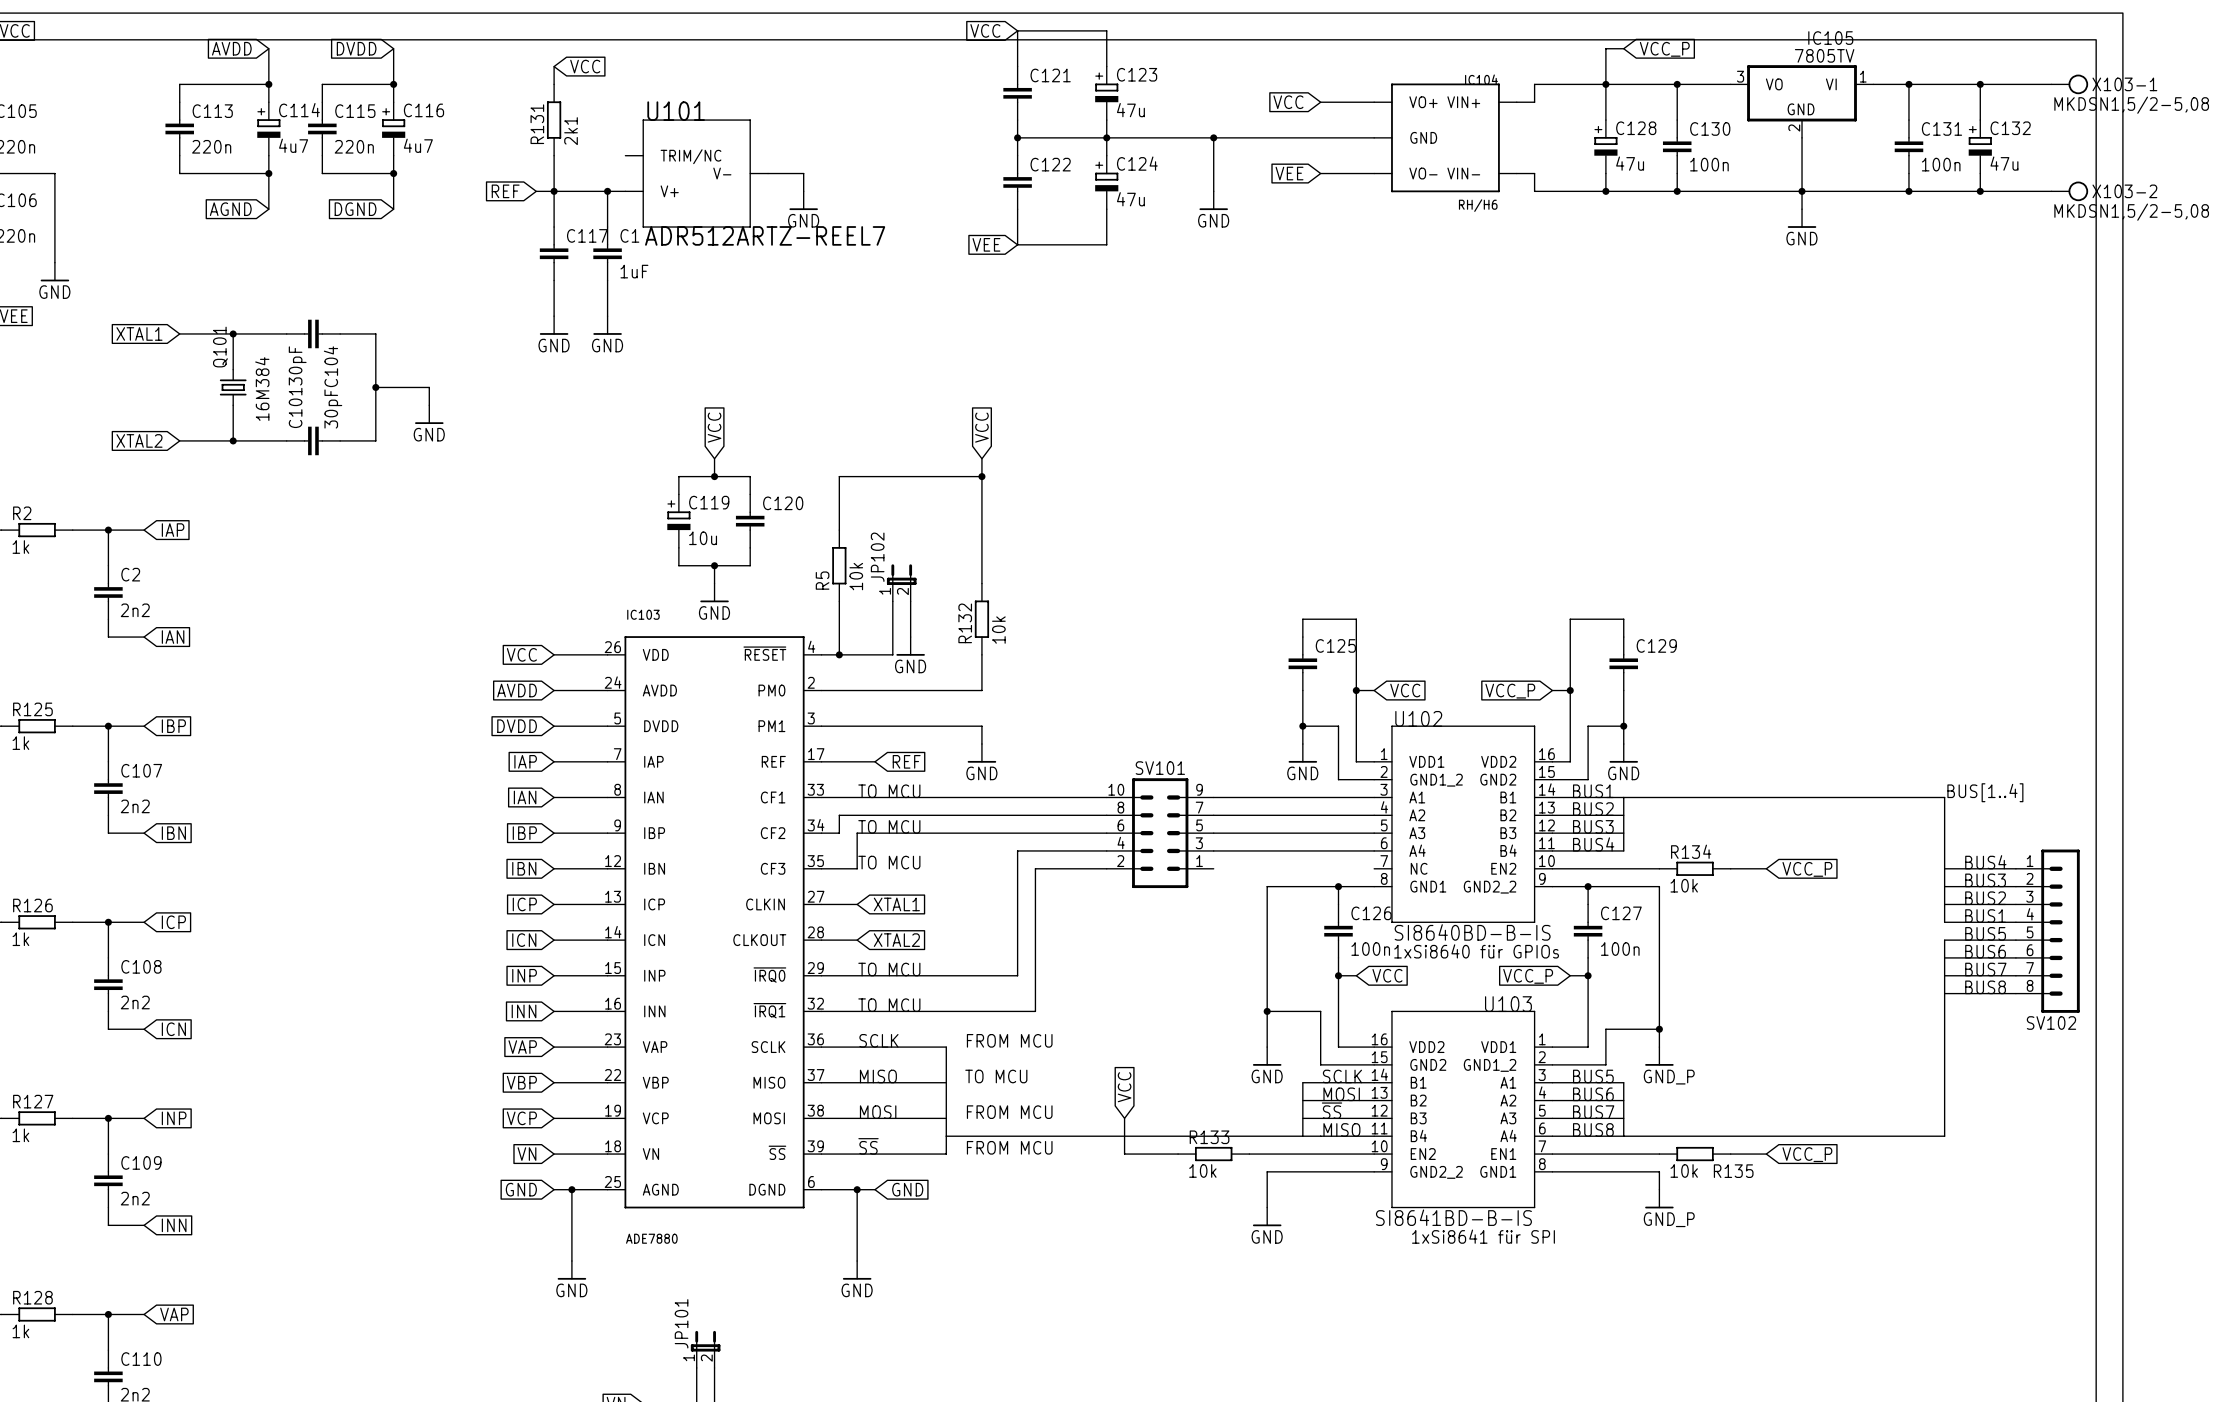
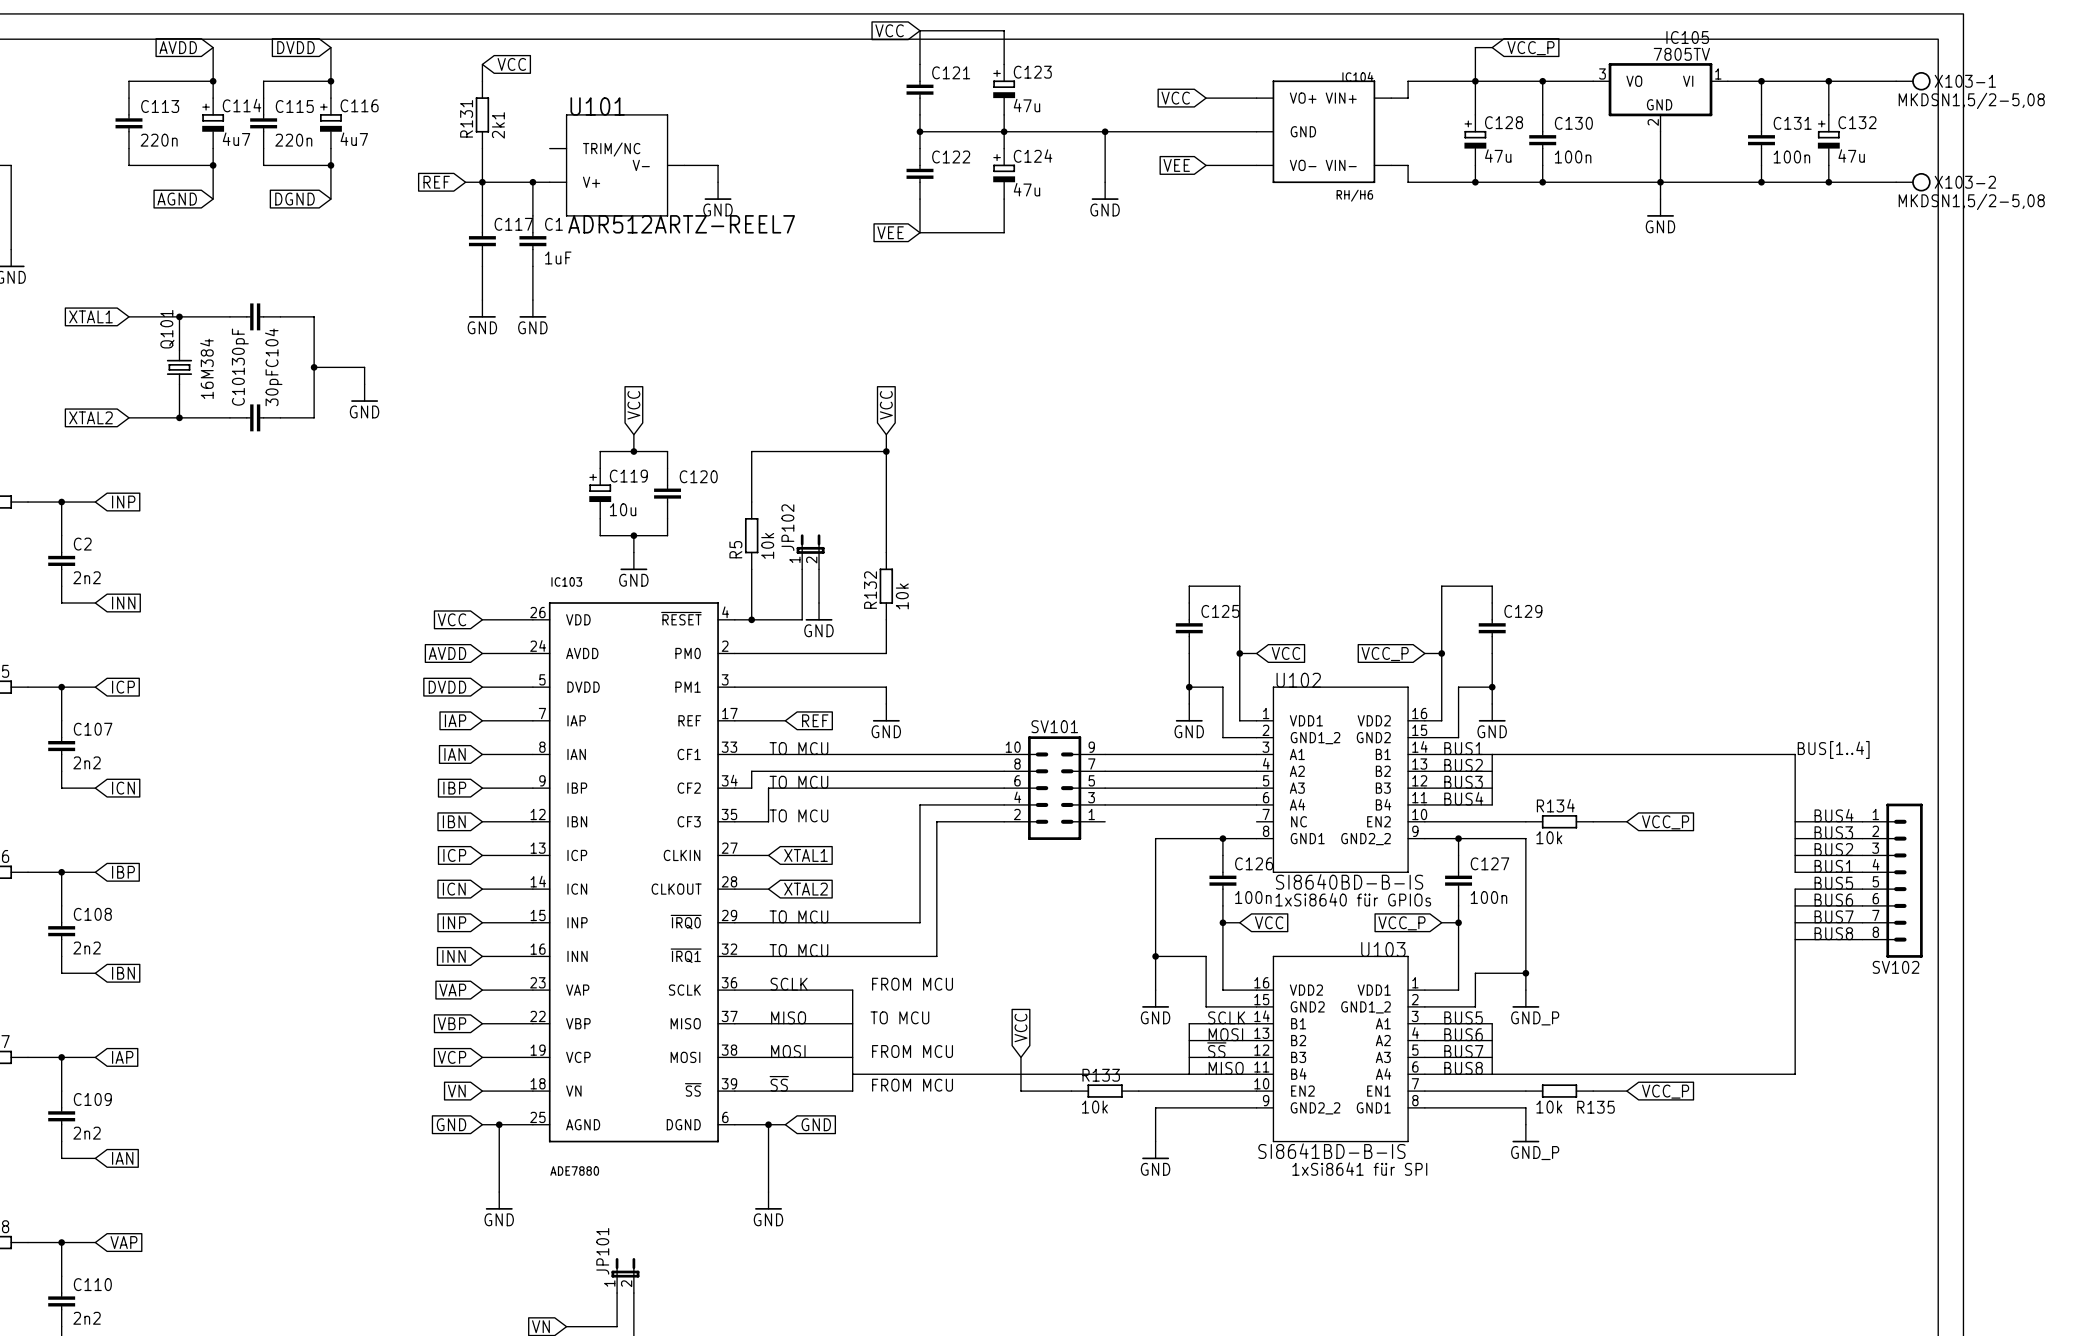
global label: IAP (173, 530) -> INP (123, 502)
global label: IAN (173, 637) -> INN (123, 603)
global label: IBP (173, 726) -> ICP (123, 687)
global label: IBN (173, 833) -> ICN (123, 788)
global label: ICP (173, 922) -> IBP (123, 872)
global label: ICN (173, 1029) -> IBN (123, 973)
global label: INP (174, 1118) -> IAP (122, 1057)
global label: INN (174, 1225) -> IAN (122, 1158)

